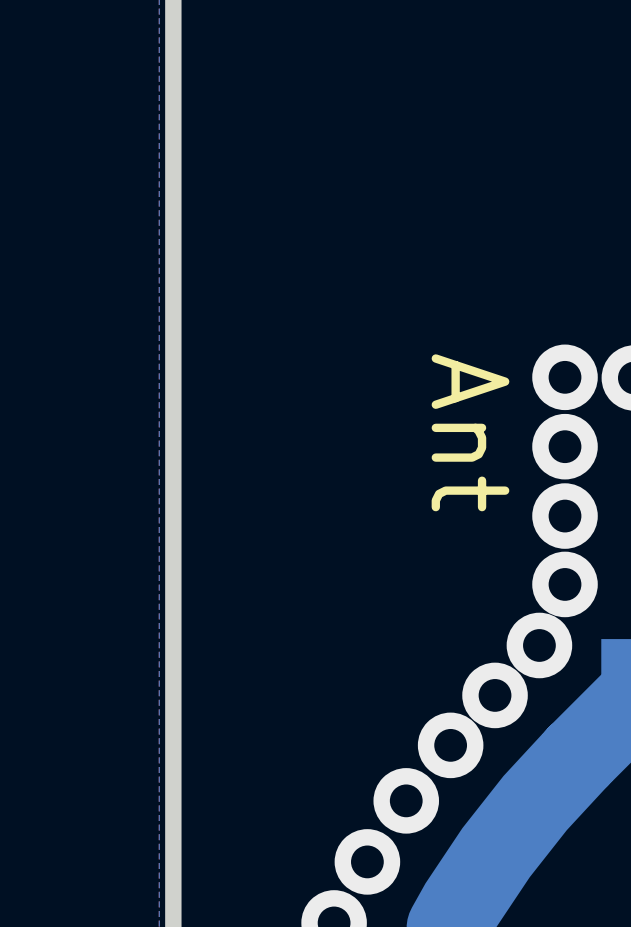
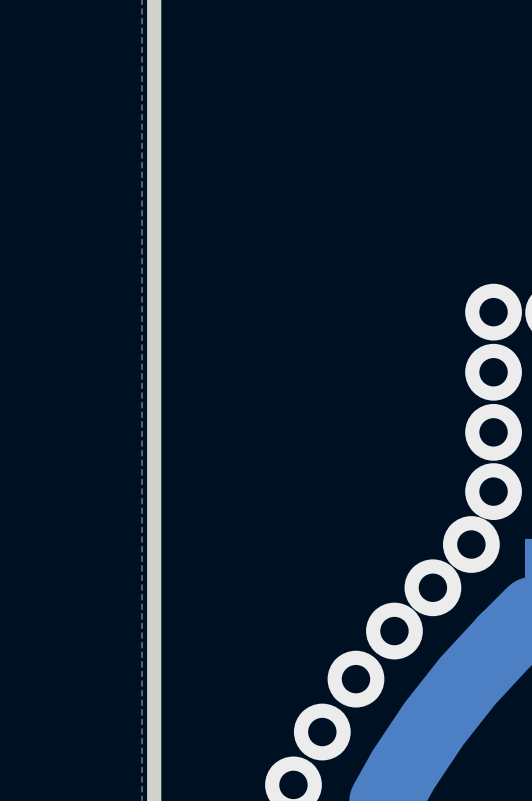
text: Ant (470, 432) -> none

